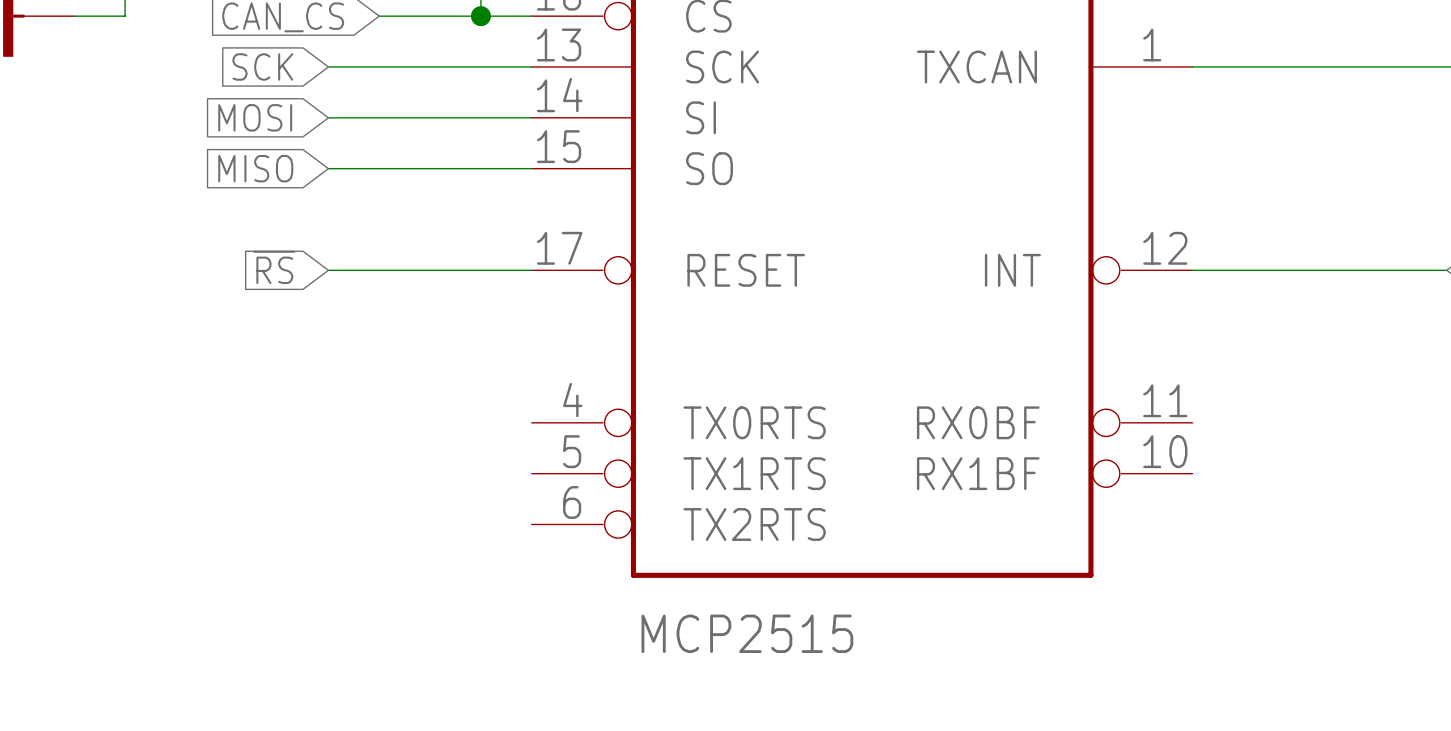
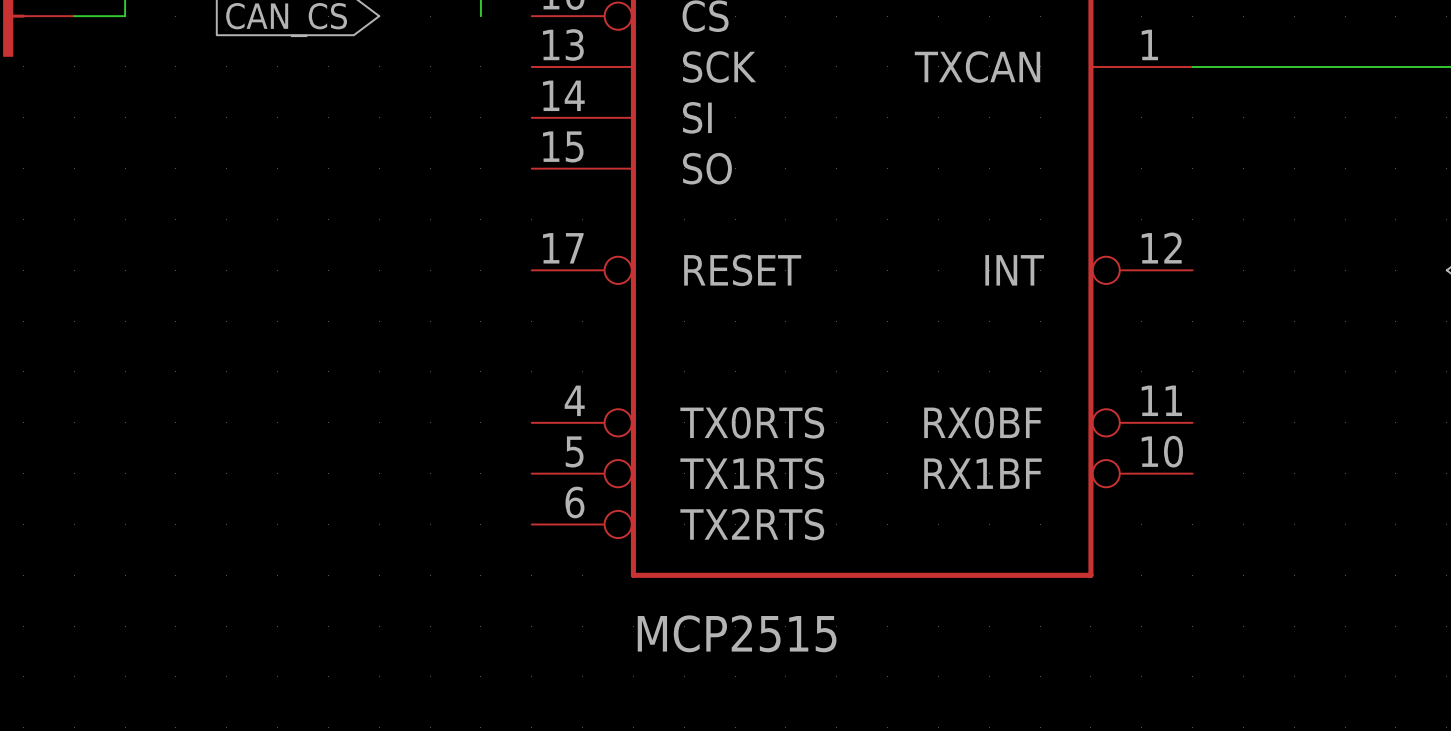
wire: (379, 16) (531, 16) -> none
junction: (480, 16) -> none
global label: SCK (262, 66) -> none
wire: (328, 66) (531, 66) -> none
global label: MOSI (255, 117) -> none
wire: (328, 117) (531, 117) -> none
global label: MISO (255, 168) -> none
wire: (328, 168) (531, 168) -> none
global label: ~{RS} (274, 267) -> none
wire: (328, 270) (531, 270) -> none
wire: (1192, 270) (1446, 270) -> none

